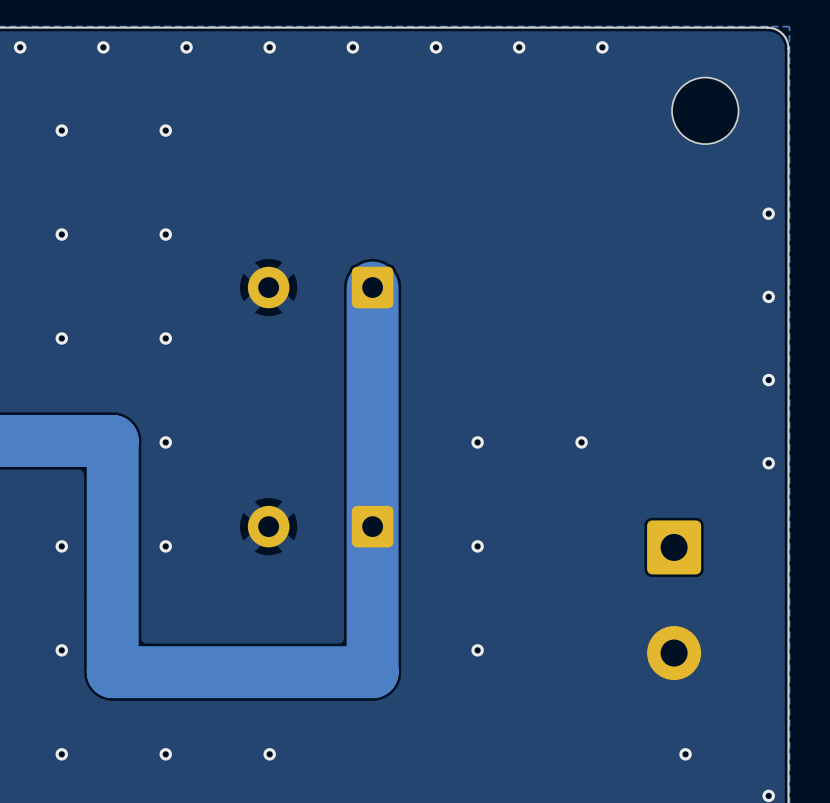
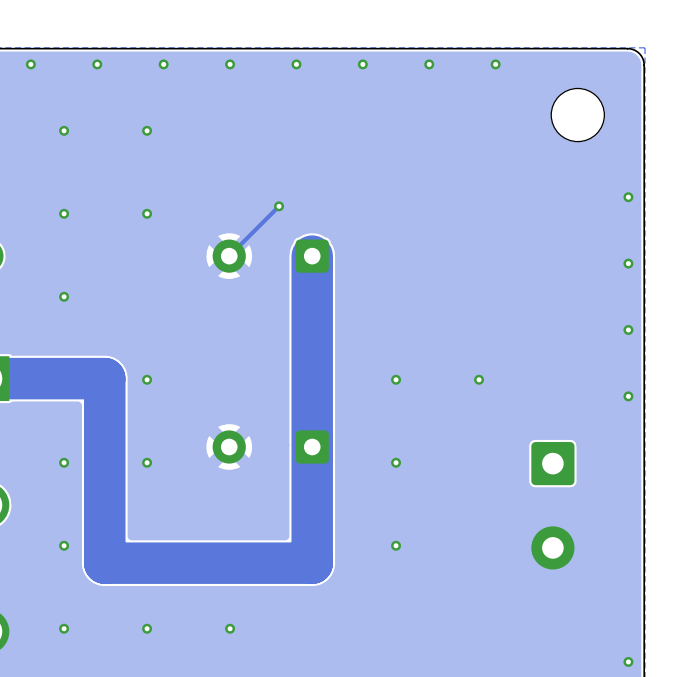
track: none -> (279, 206) (229, 256)
via: none -> (279, 206)
via: (165, 338) -> none
via: (685, 754) -> none

